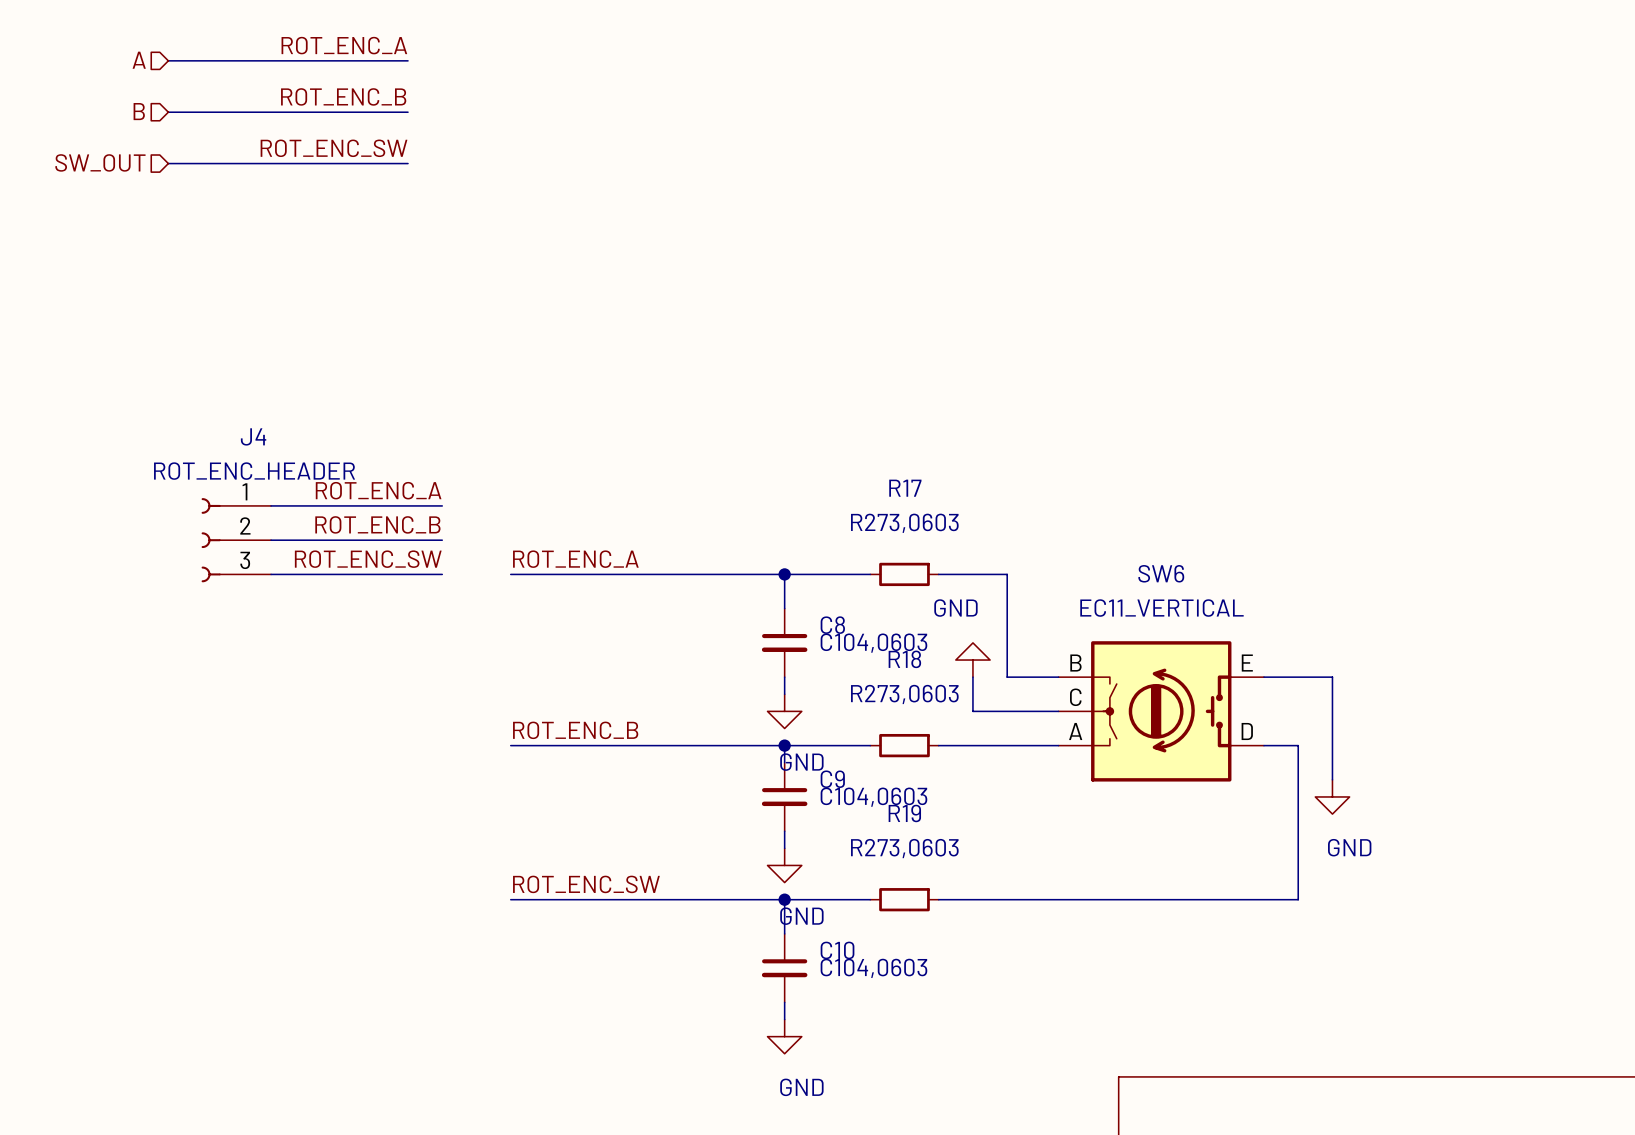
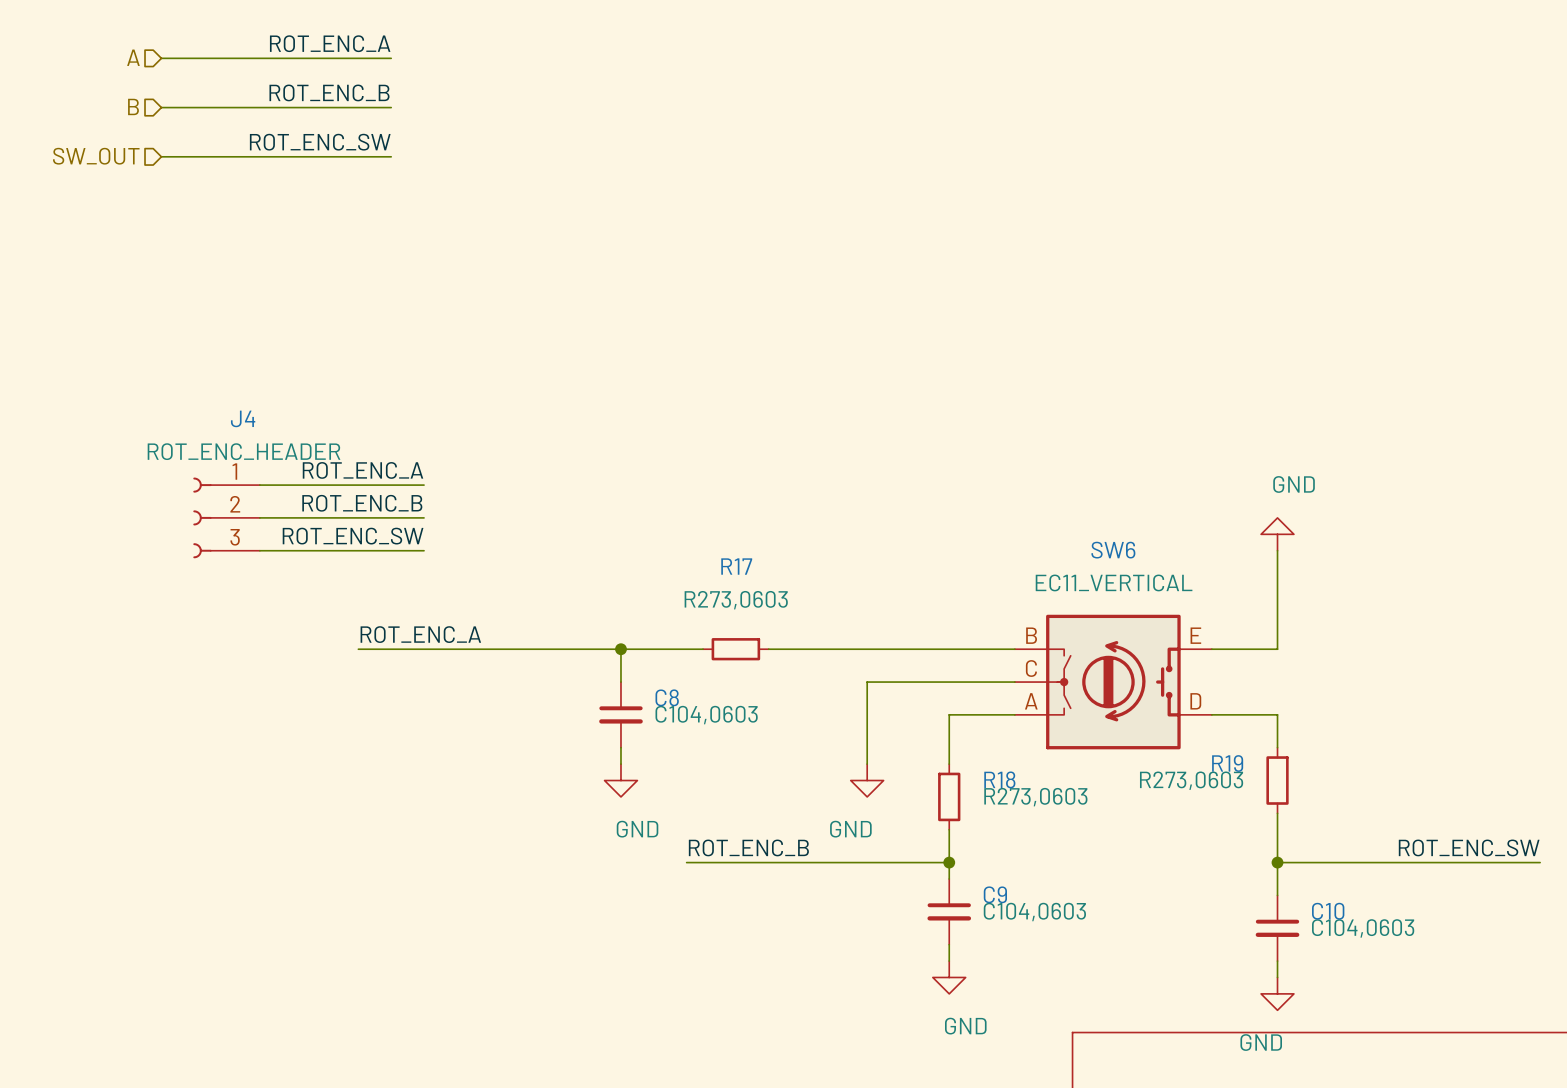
power symbol: none -> GND (1277, 534)
label position: ROT_ENC_A (575, 559) -> ROT_ENC_A (420, 634)
wire: (510, 574) (870, 574) -> (358, 649) (703, 649)
wire: (784, 574) (784, 608) -> (620, 649) (620, 682)
junction: (784, 574) -> none
R17 position: (904, 574) -> (735, 649)
wire: (938, 574) (1007, 574) (1007, 677) -> (768, 649) (965, 649)
wire: none -> (1277, 550) (1277, 649)
C8 position: (784, 642) -> (620, 714)
R18 name position: R18 (904, 659) -> R18 (999, 779)
power symbol: GND (972, 660) -> none
junction: none -> (620, 649)
wire: (784, 677) (784, 694) -> (620, 747) (620, 764)
wire: (972, 677) (972, 711) -> (867, 764) (867, 682) (932, 682)
wire: (1332, 677) (1332, 745) -> (1244, 714) (1277, 714)
R18 value position: R273,0603 (904, 694) -> R273,0603 (1035, 797)
power symbol: GND (784, 711) -> none
label position: ROT_ENC_B (575, 730) -> ROT_ENC_B (748, 847)
wire: (510, 745) (870, 745) -> none
wire: (784, 745) (784, 762) -> none
junction: (784, 745) -> none
R18 rotation: 0° (904, 745) -> 90° clockwise (949, 796)
R18 position: (904, 745) -> (949, 796)
wire: (938, 745) (990, 745) -> (949, 764) (949, 714)
wire: (1298, 745) (1298, 899) (990, 899) -> none
C9 position: (784, 796) -> (949, 911)
power symbol: GND (1332, 796) -> none
R19 name position: R19 (904, 813) -> R19 (1227, 763)
power symbol: none -> GND (620, 780)
power symbol: none -> GND (867, 780)
wire: (784, 831) (784, 848) -> none
R19 value position: R273,0603 (904, 848) -> R273,0603 (1191, 780)
wire: none -> (1277, 813) (1277, 895)
power symbol: GND (784, 865) -> none
wire: none -> (949, 829) (949, 879)
label: ROT_ENC_SW (586, 884) -> none
label: none -> ROT_ENC_SW (1469, 847)
wire: (510, 899) (716, 899) -> none
wire: (784, 899) (784, 933) -> none
junction: (784, 899) -> none
wire: none -> (834, 862) (900, 862)
R19 rotation: 0° (904, 899) -> 90° clockwise (1277, 780)
R19 position: (904, 899) -> (1277, 780)
junction: none -> (949, 862)
wire: none -> (1277, 862) (1540, 862)
junction: none -> (1277, 862)
C10 position: (784, 968) -> (1277, 928)
wire: (784, 1002) (784, 1019) -> (949, 944) (949, 961)
wire: none -> (1277, 961) (1277, 977)
power symbol: none -> GND (949, 977)
power symbol: GND (784, 1036) -> none
power symbol: none -> GND (1277, 993)

